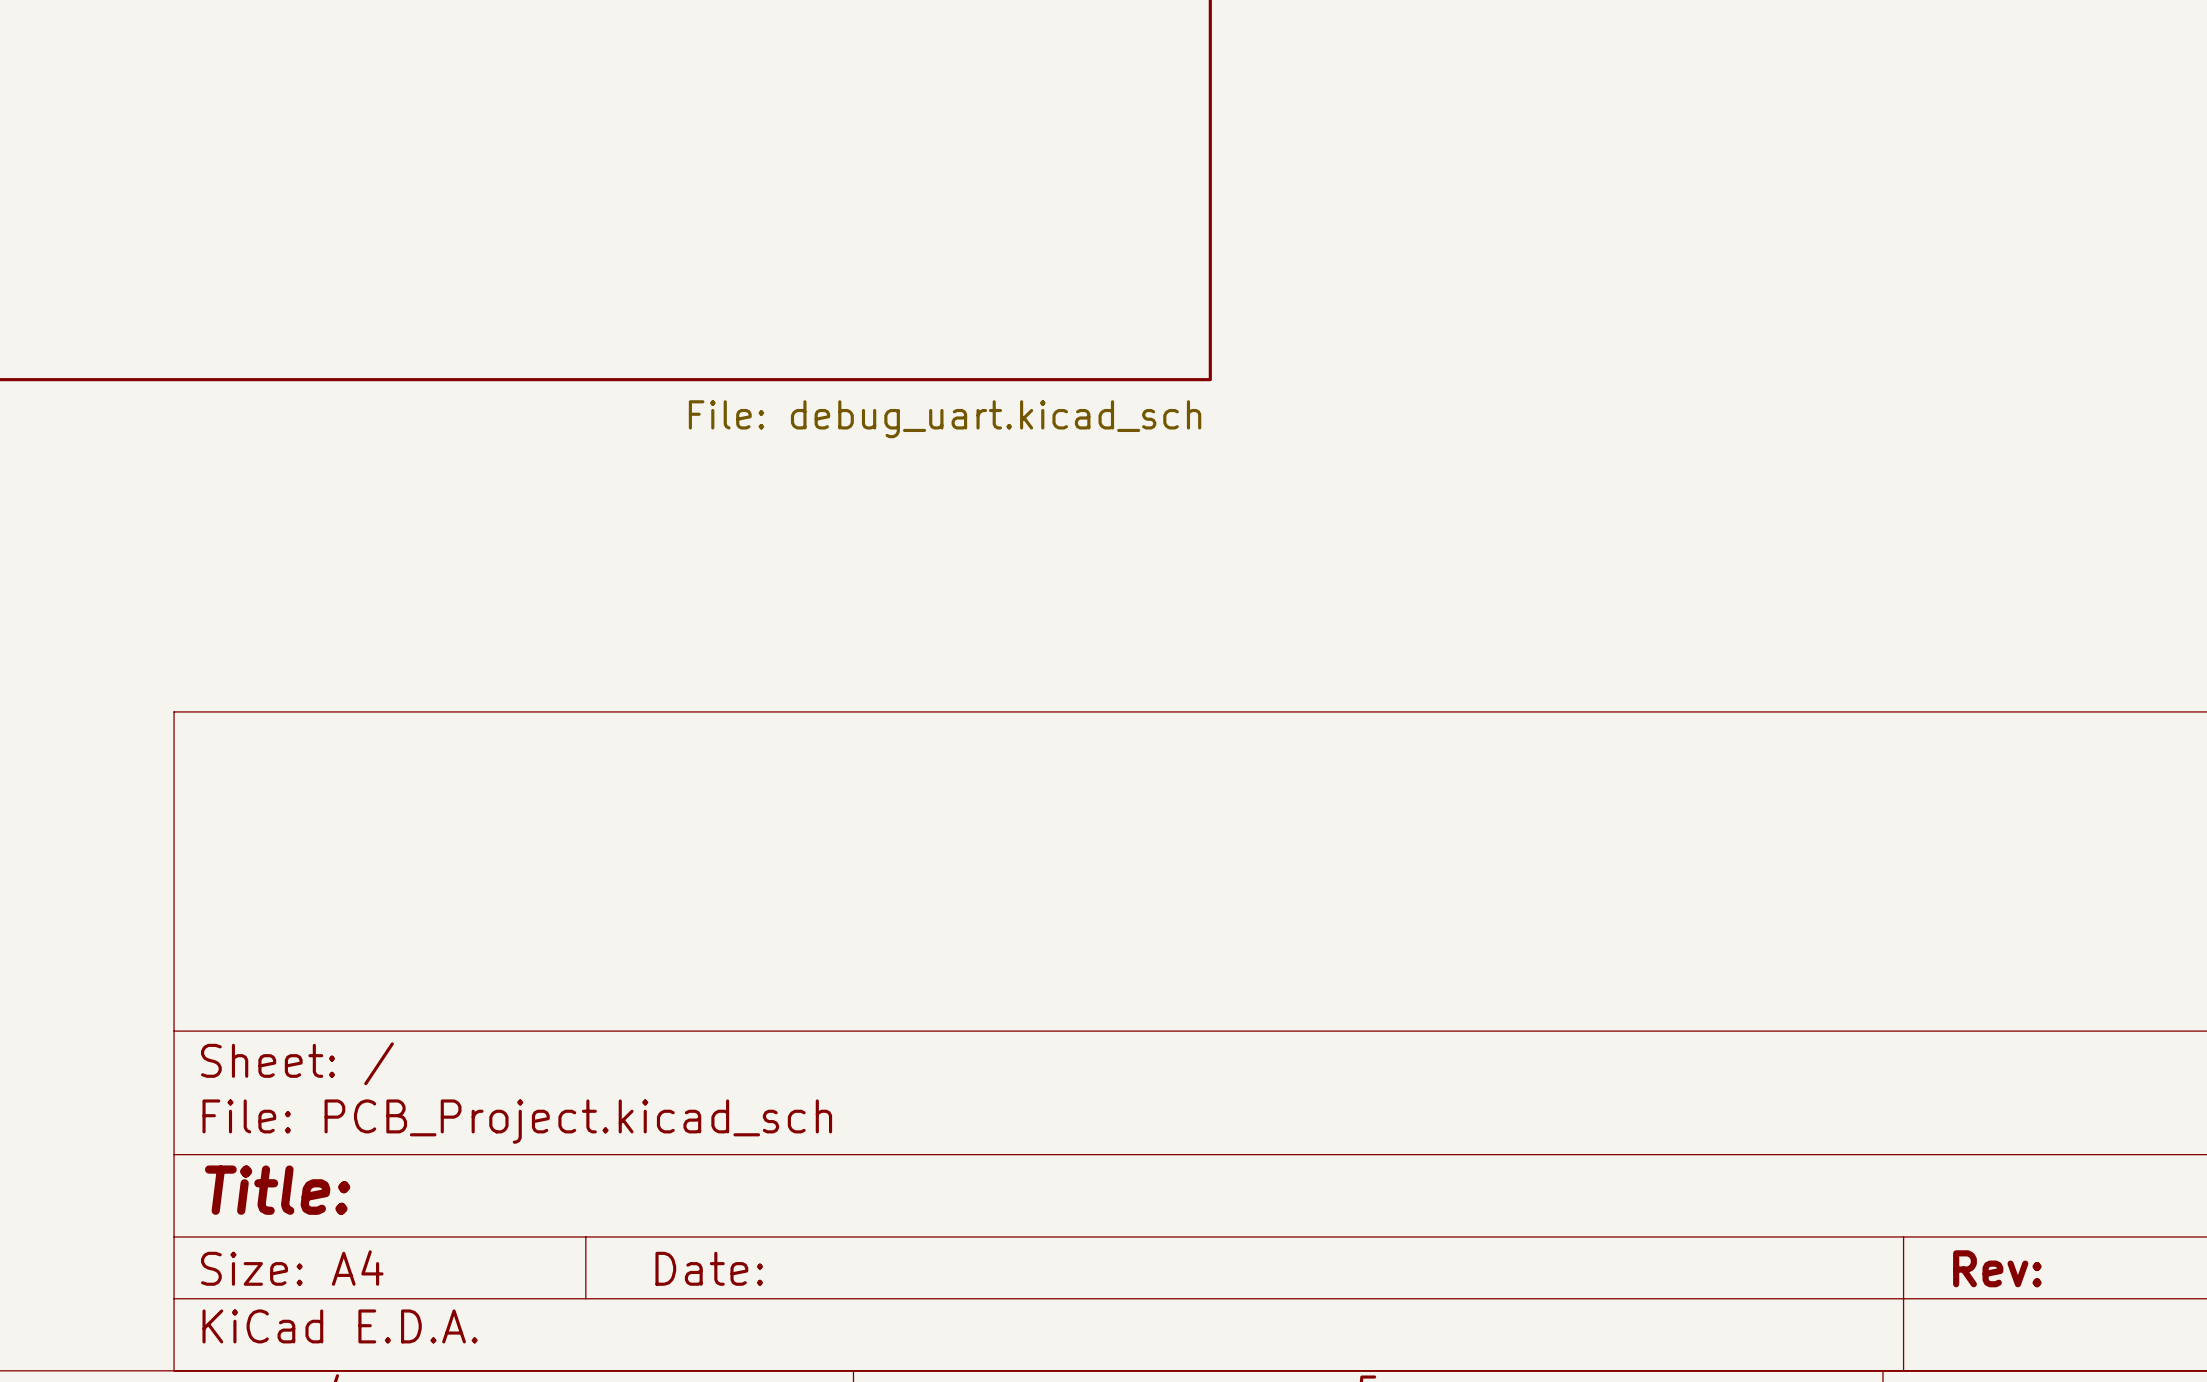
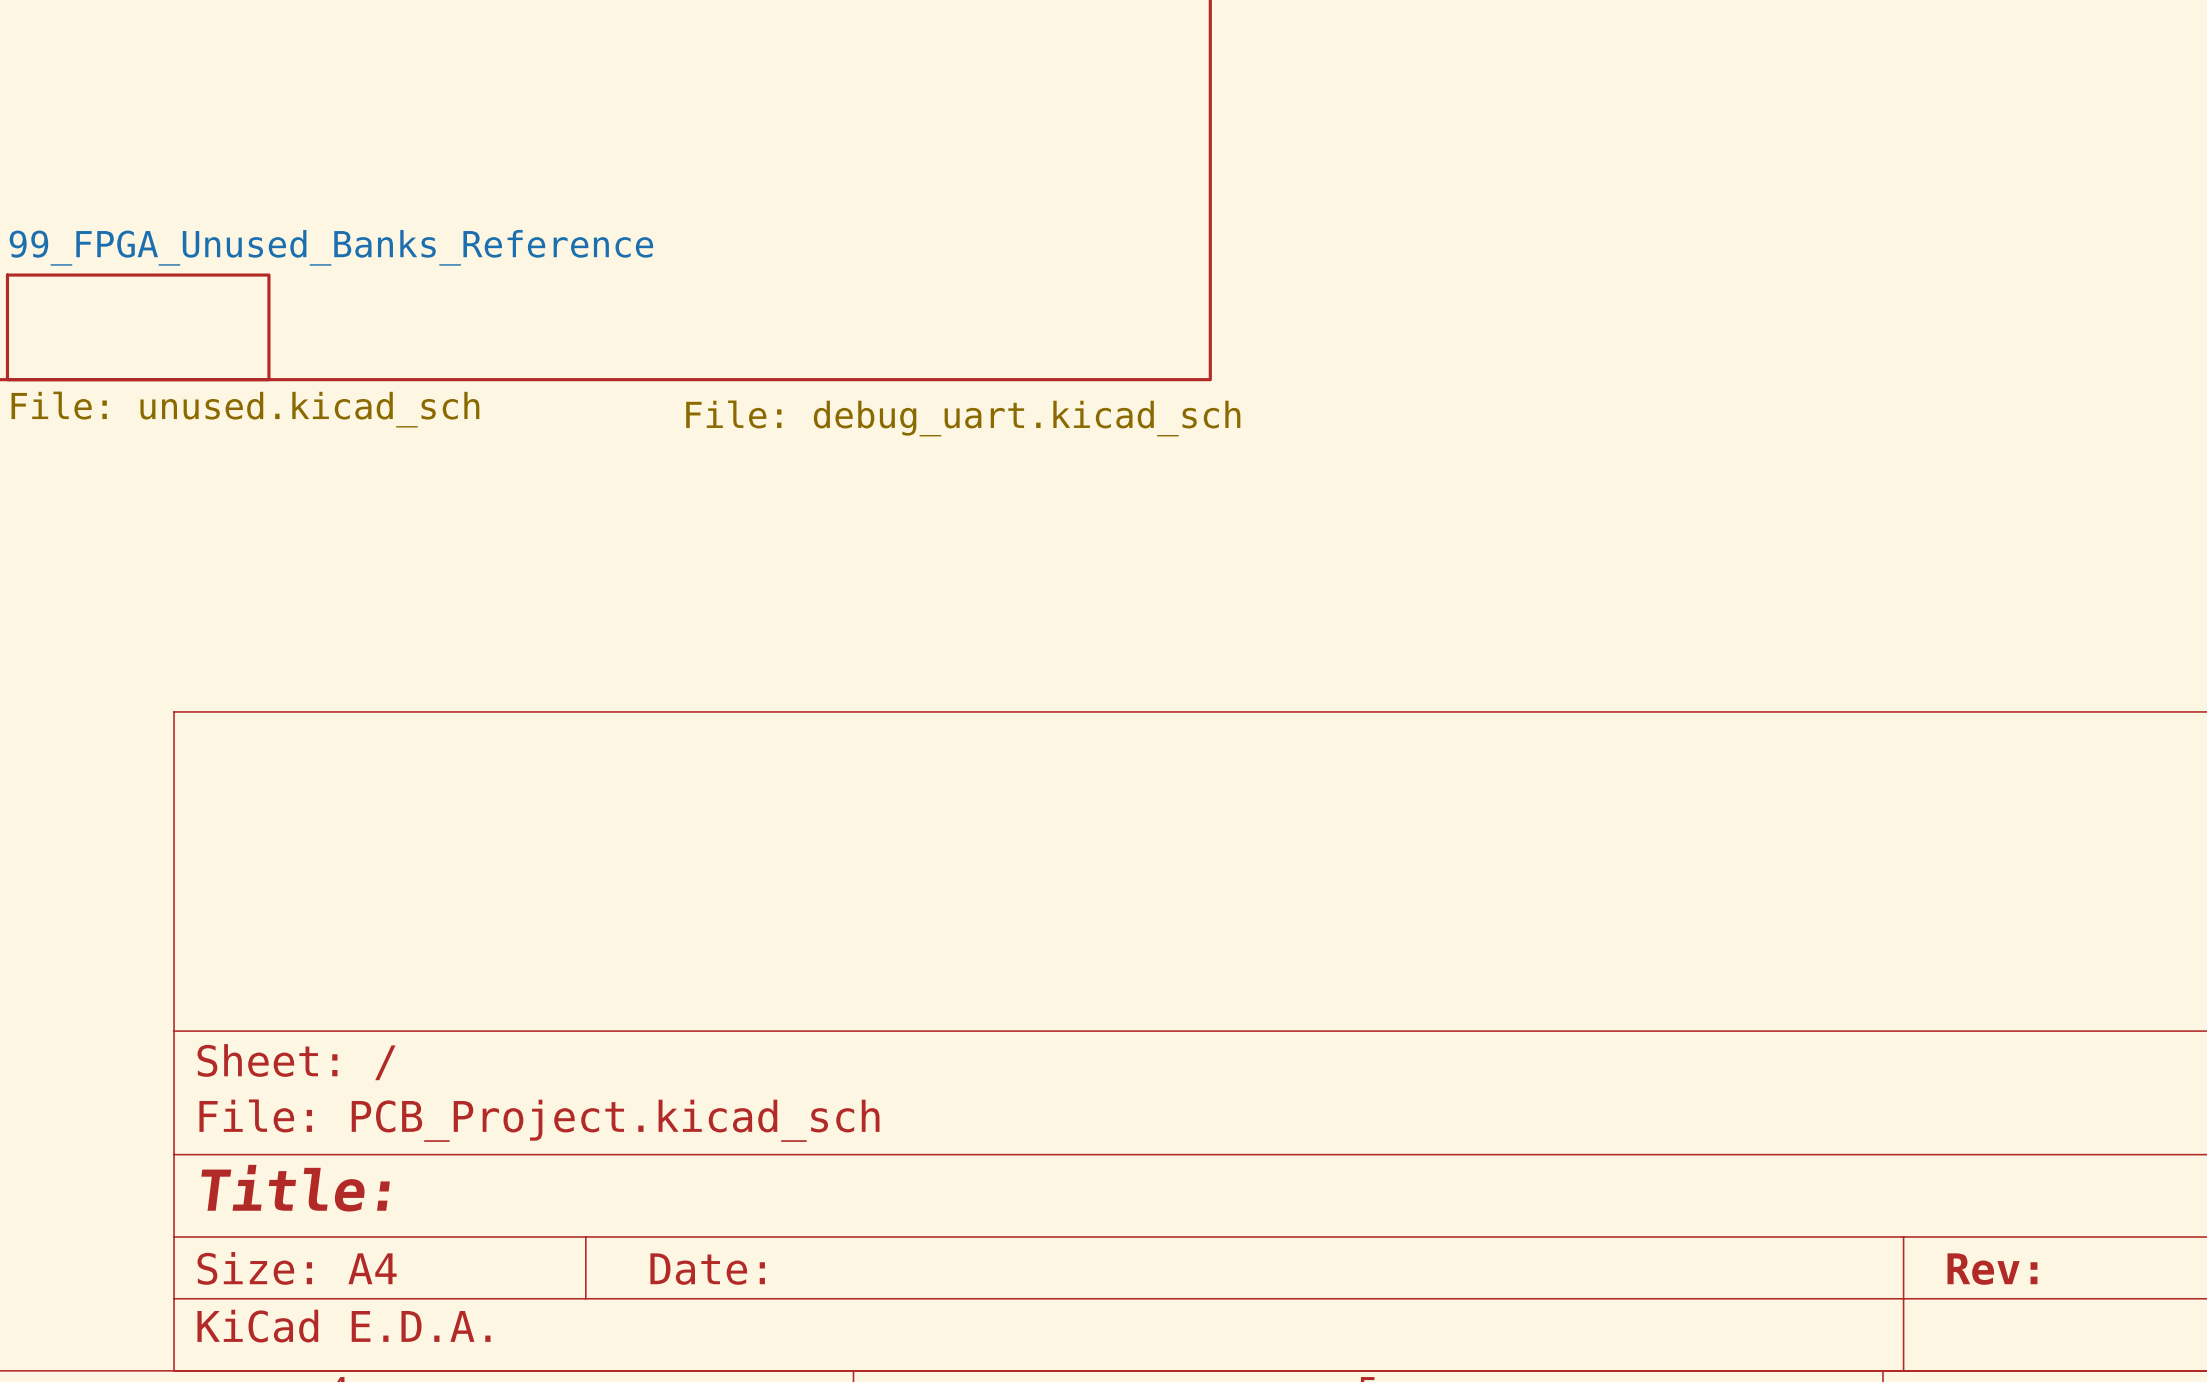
sheet 99_FPGA_Unused_Banks_Reference: none -> File: unused.kicad_sch (138, 327)

